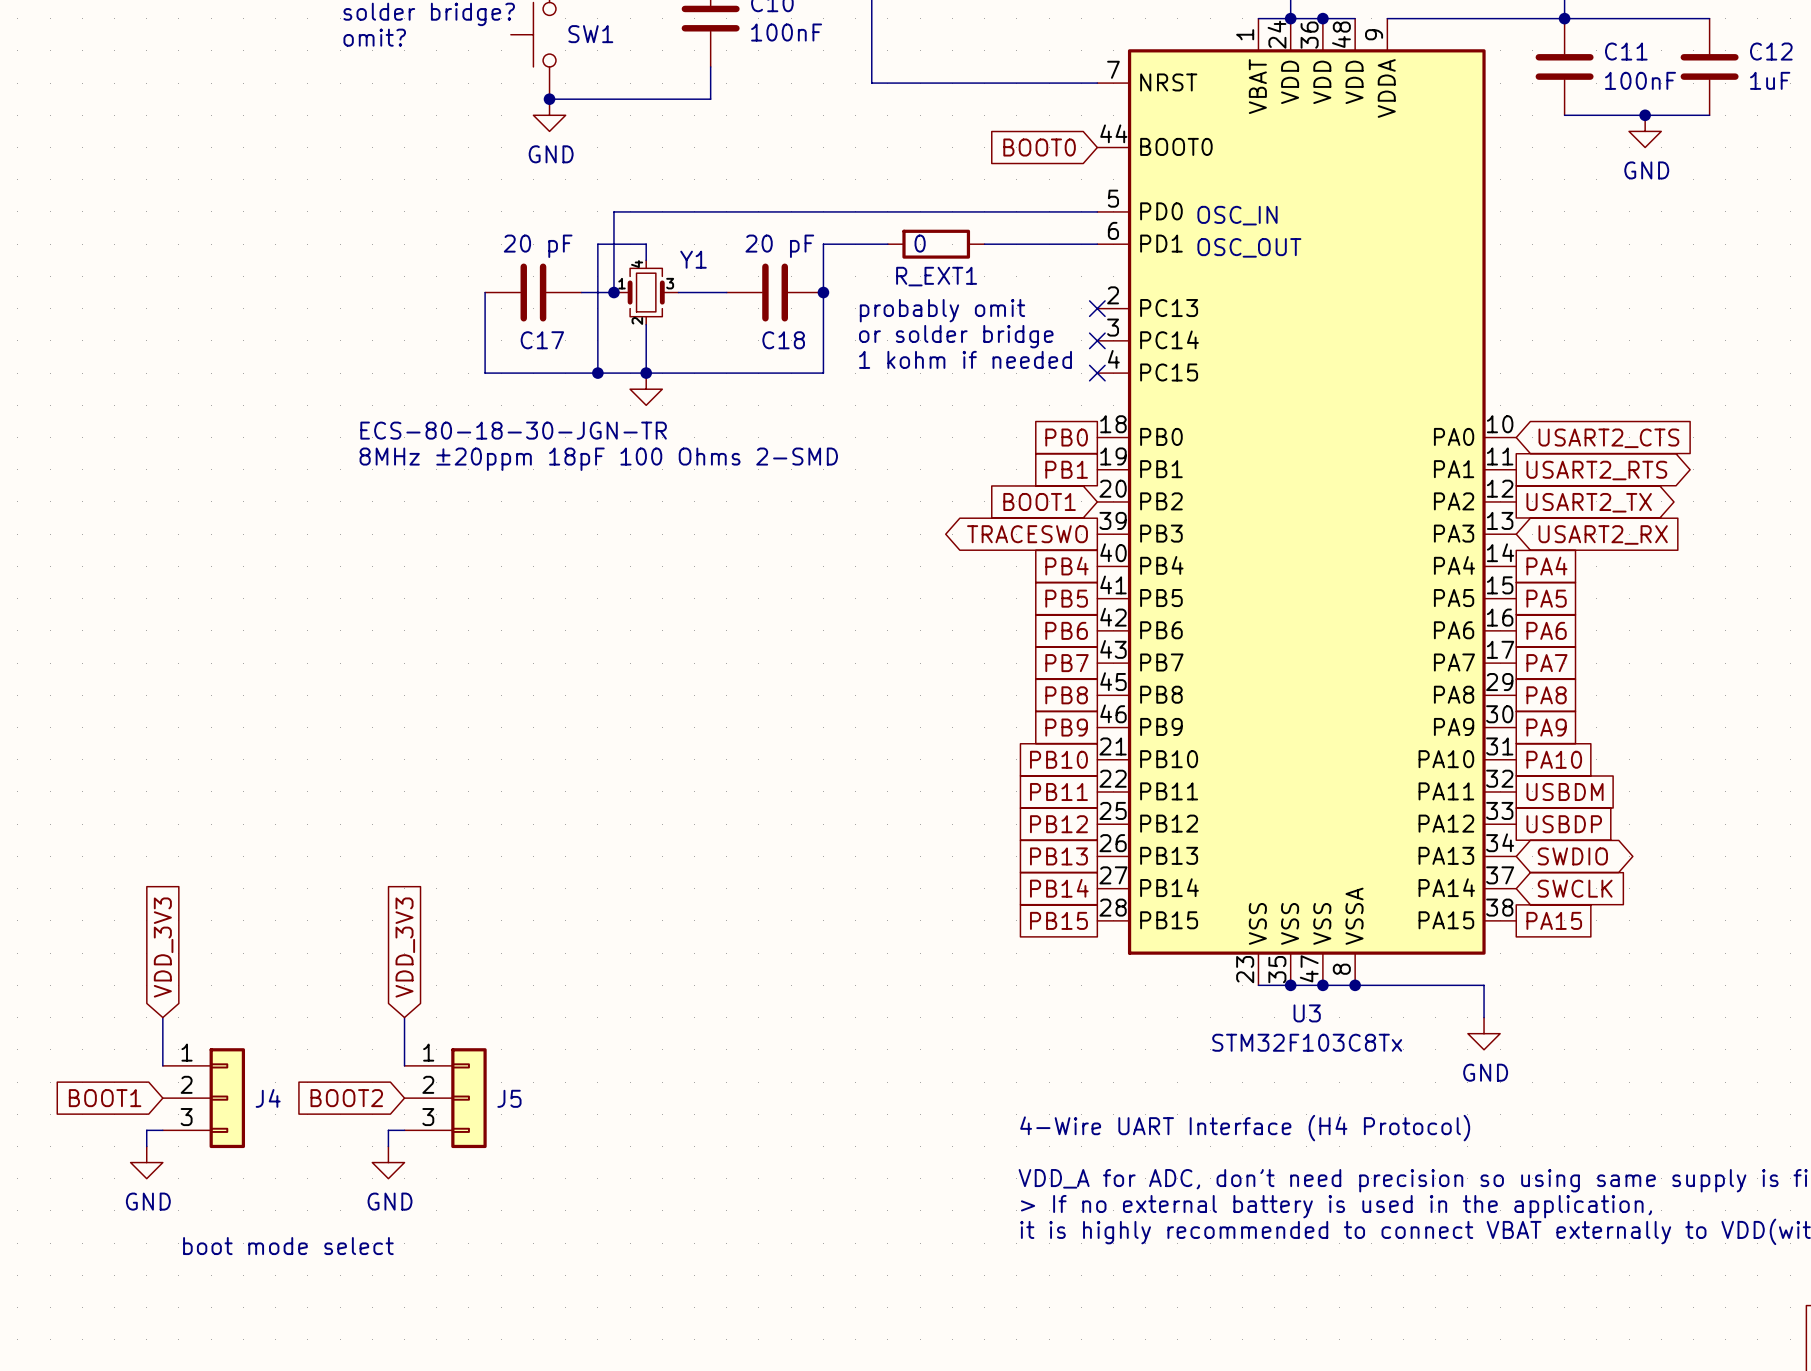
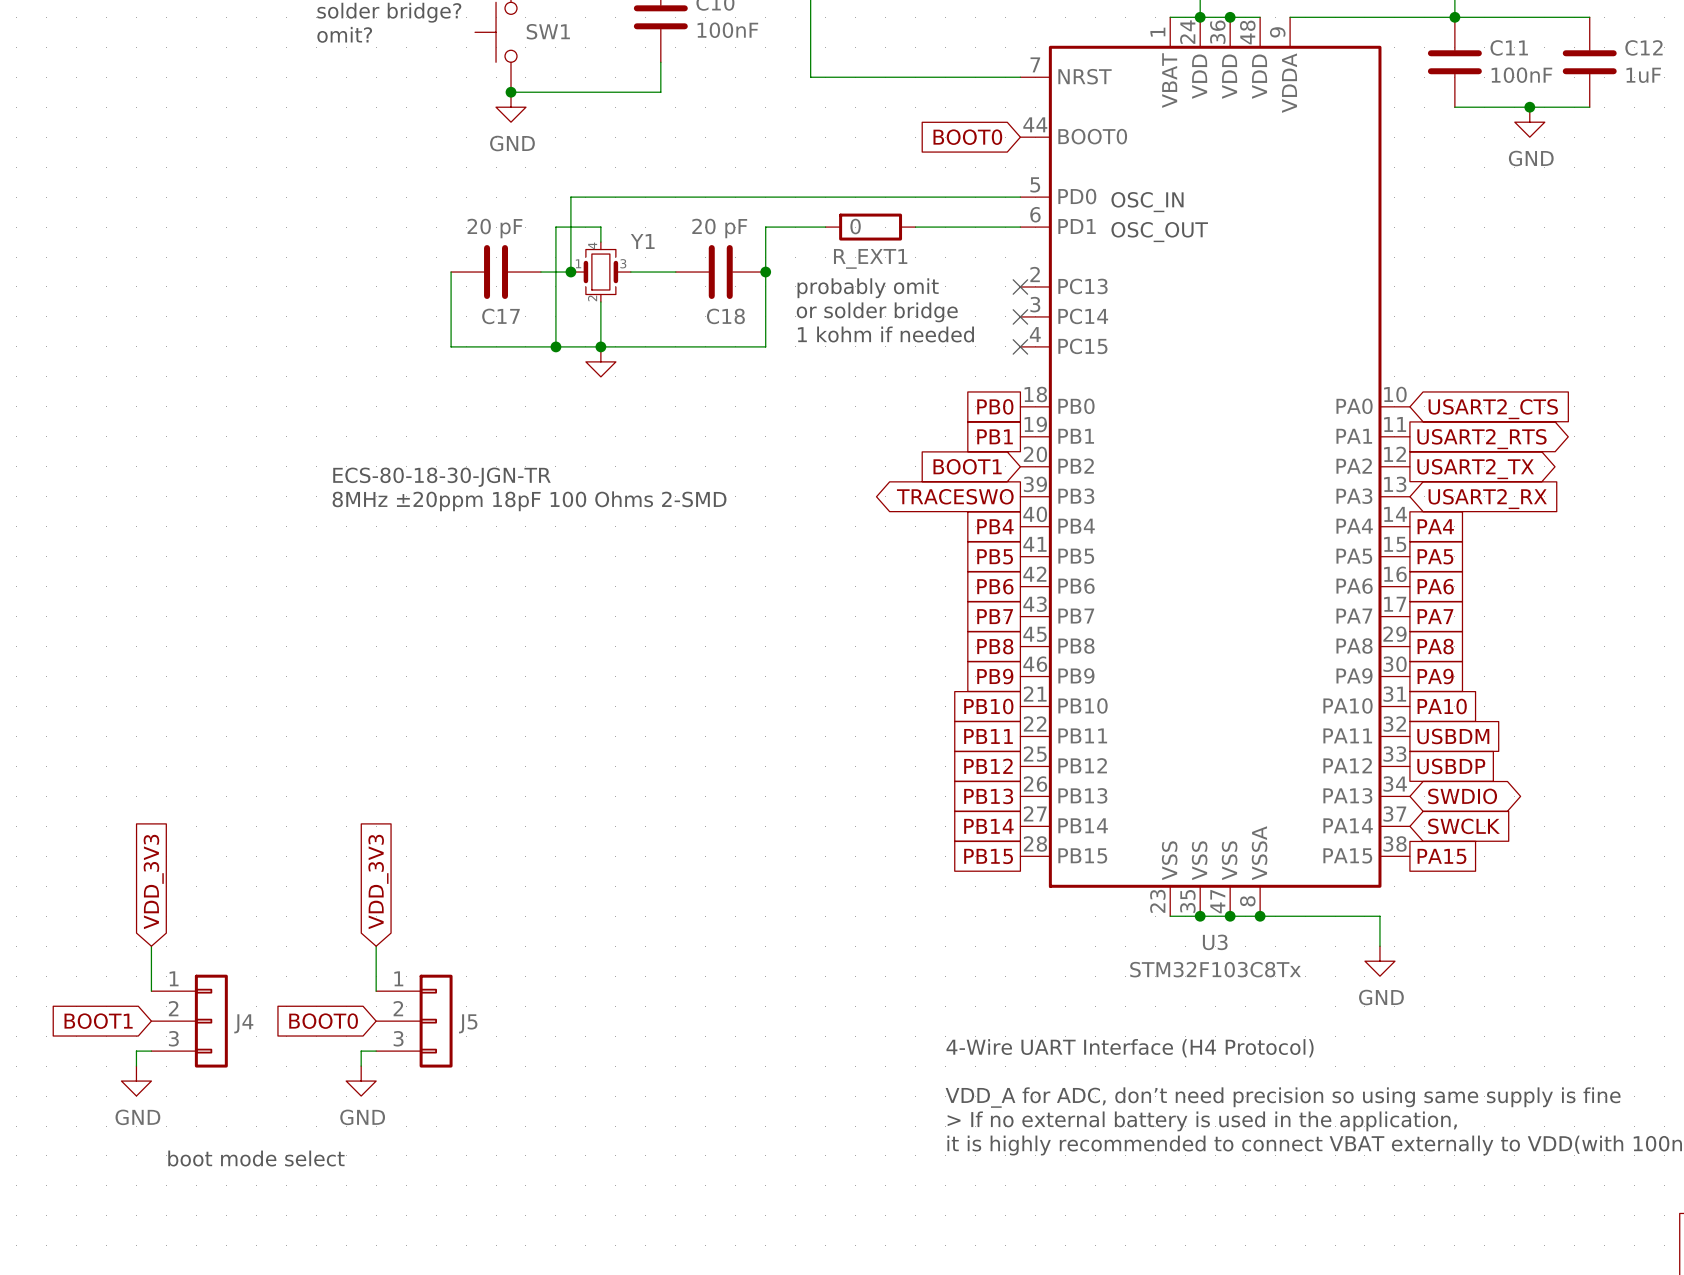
text position: ECS-80-18-30-JGN-TR (513, 430) -> ECS-80-18-30-JGN-TR (441, 477)
text position: 8MHz ±20ppm 18pF 100 Ohms 2-SMD (598, 459) -> 8MHz ±20ppm 18pF 100 Ohms 2-SMD (529, 501)
global label: BOOT2 (346, 1098) -> BOOT0 (323, 1021)

